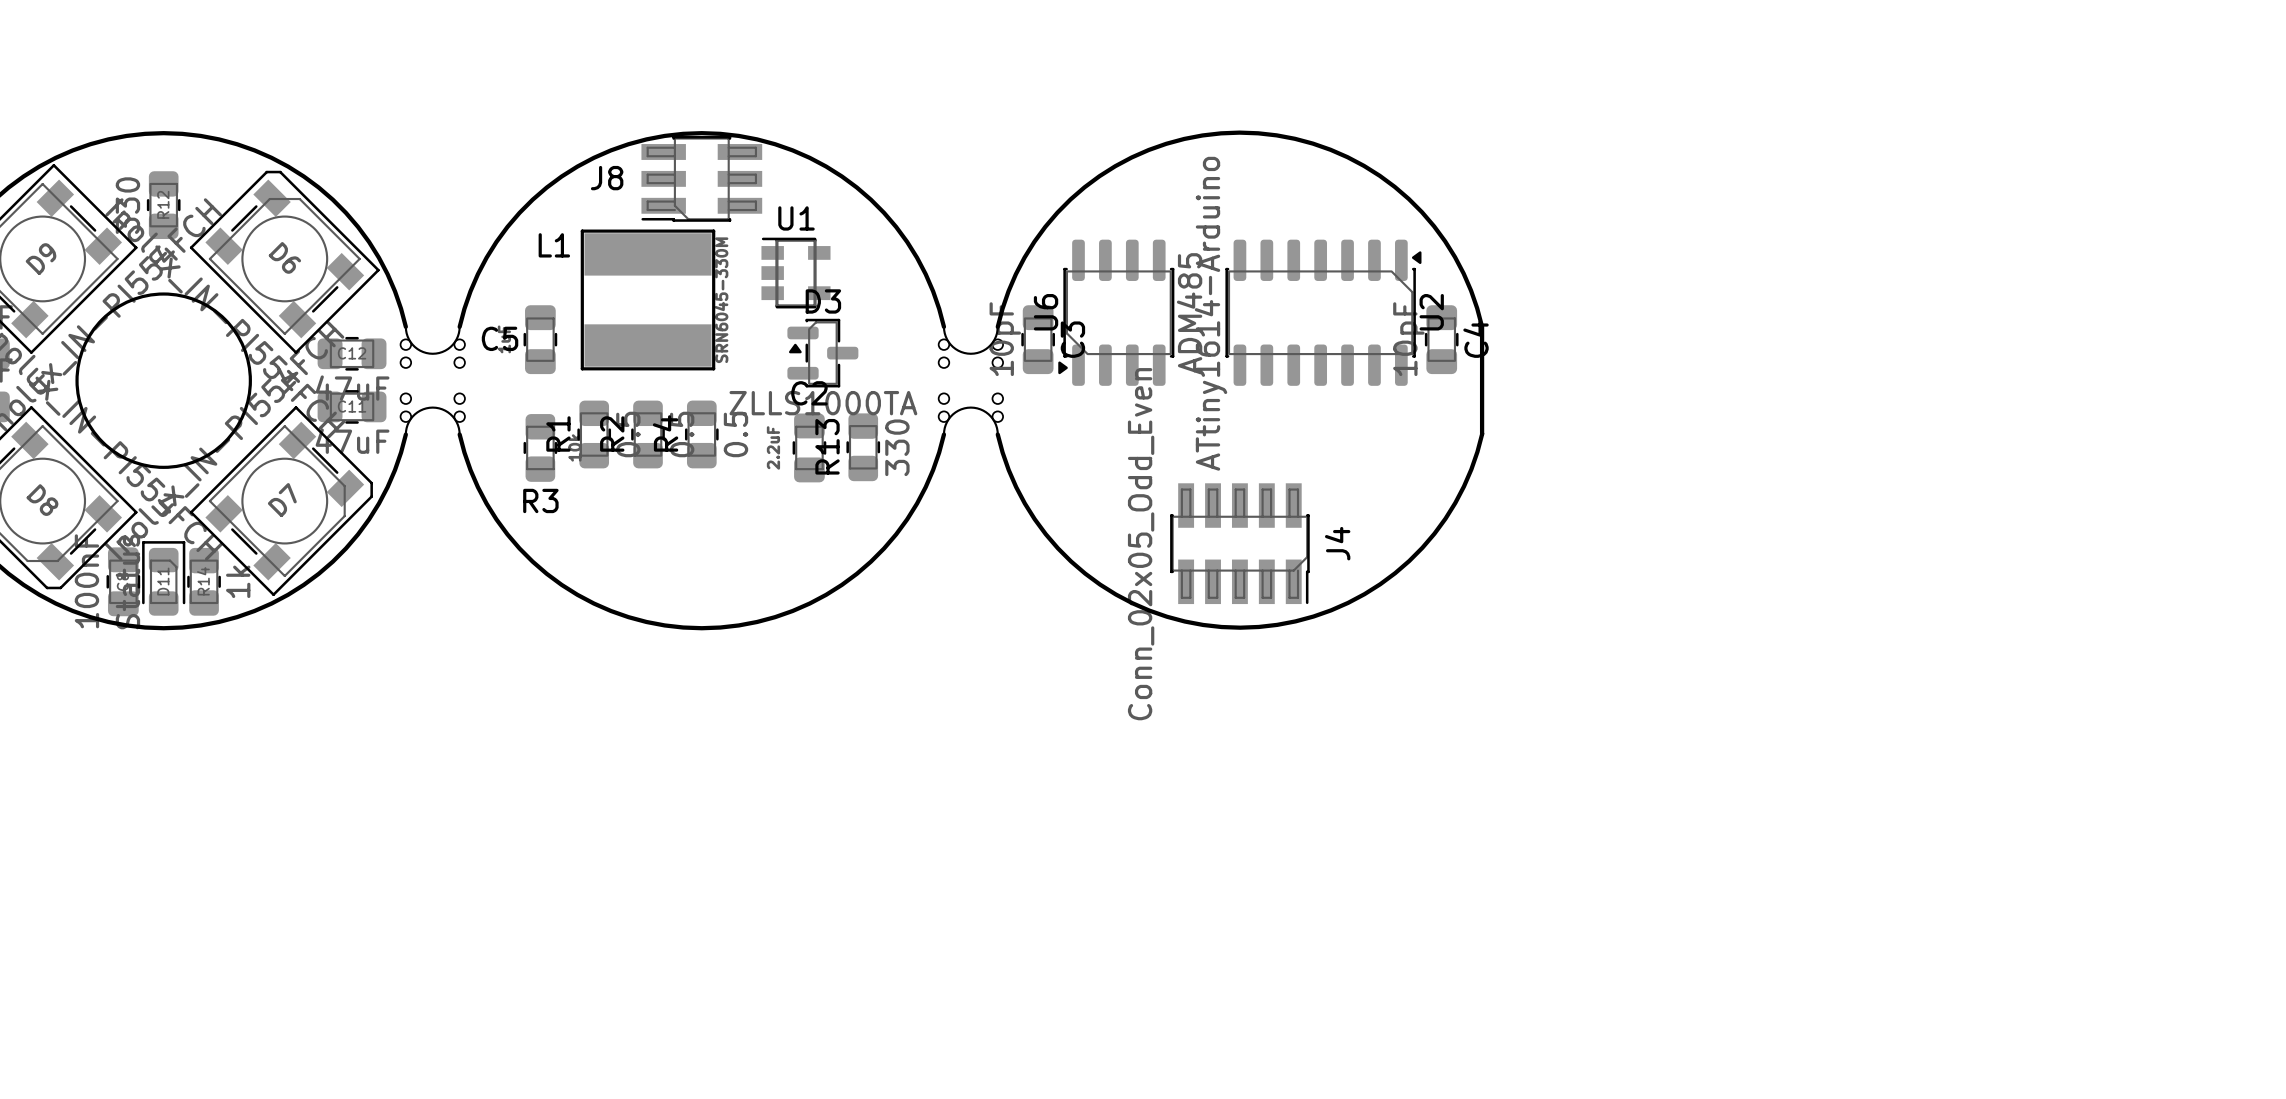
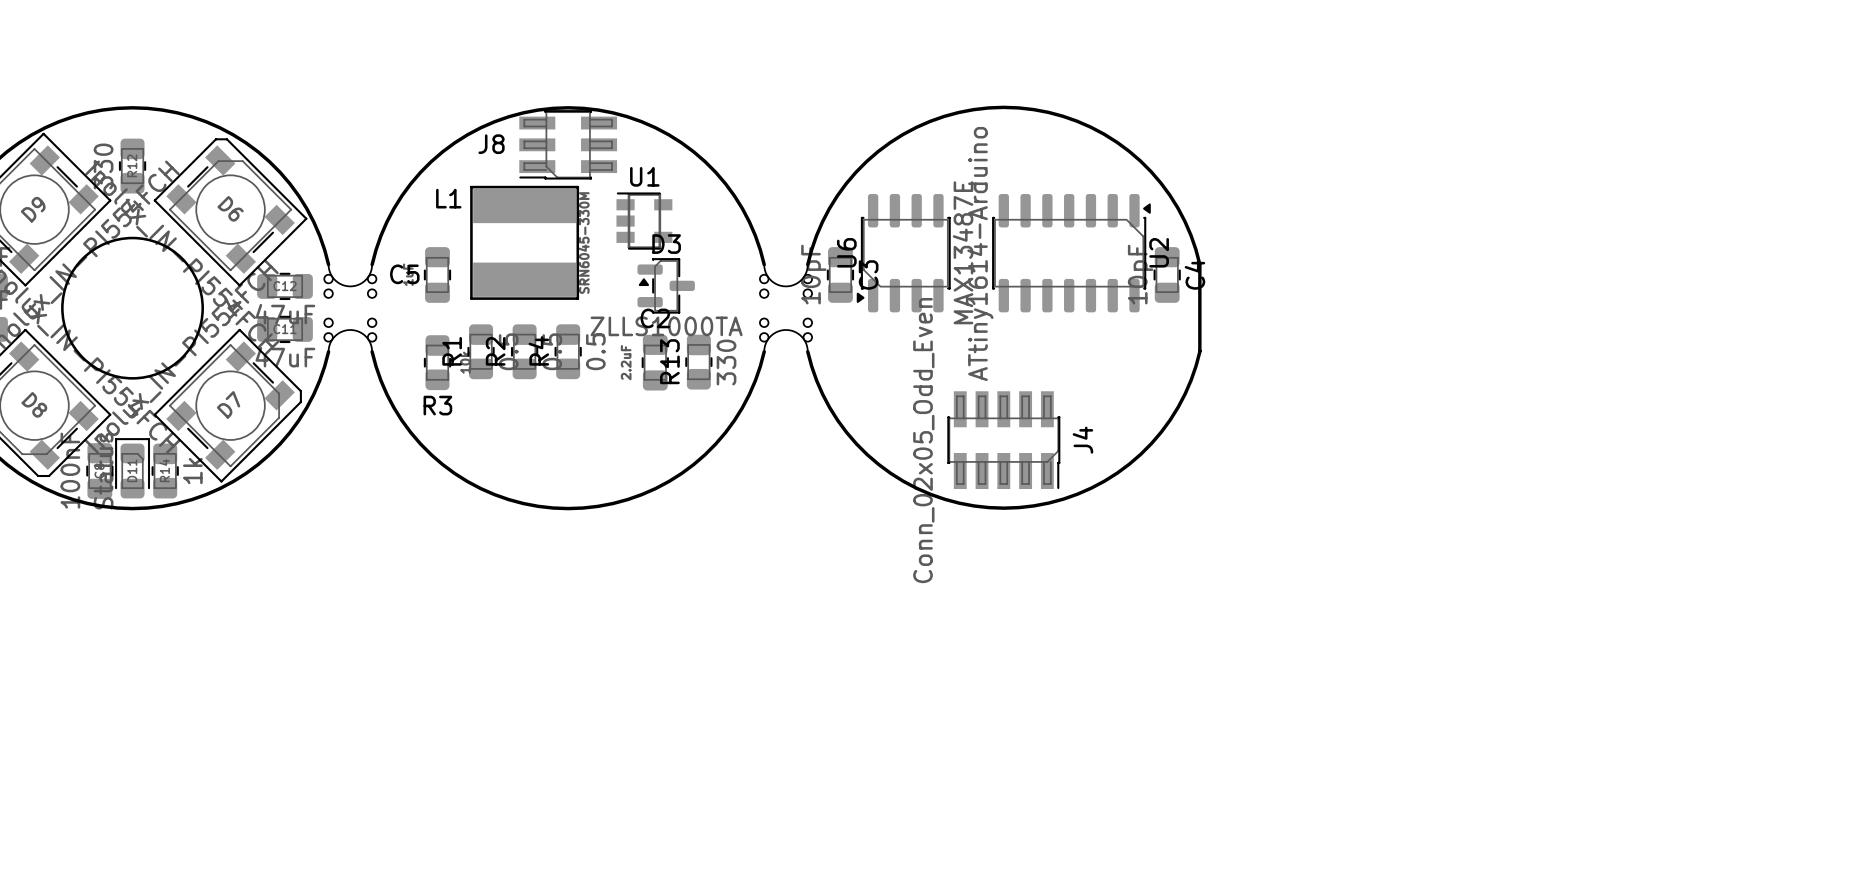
U6 value: ADM485 (1189, 313) -> MAX13487E (963, 252)

